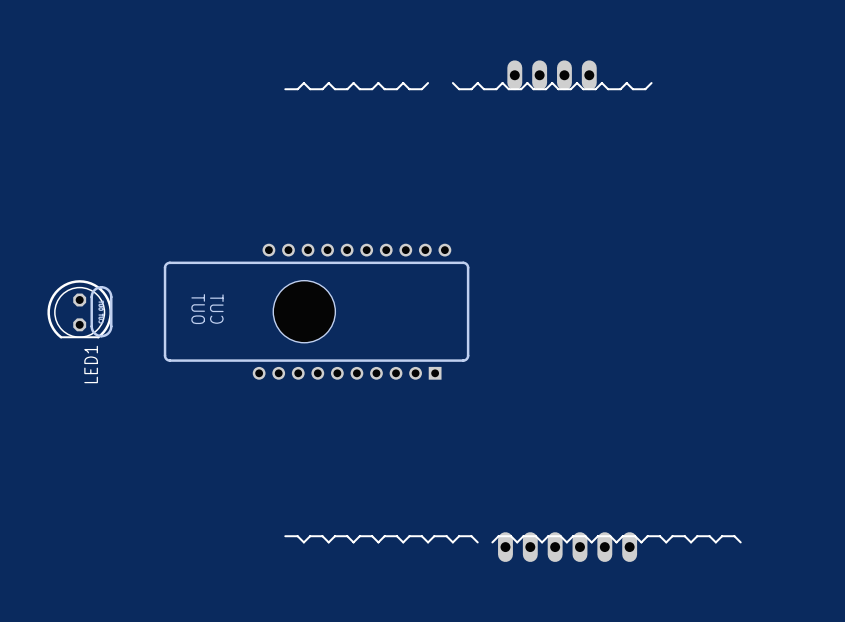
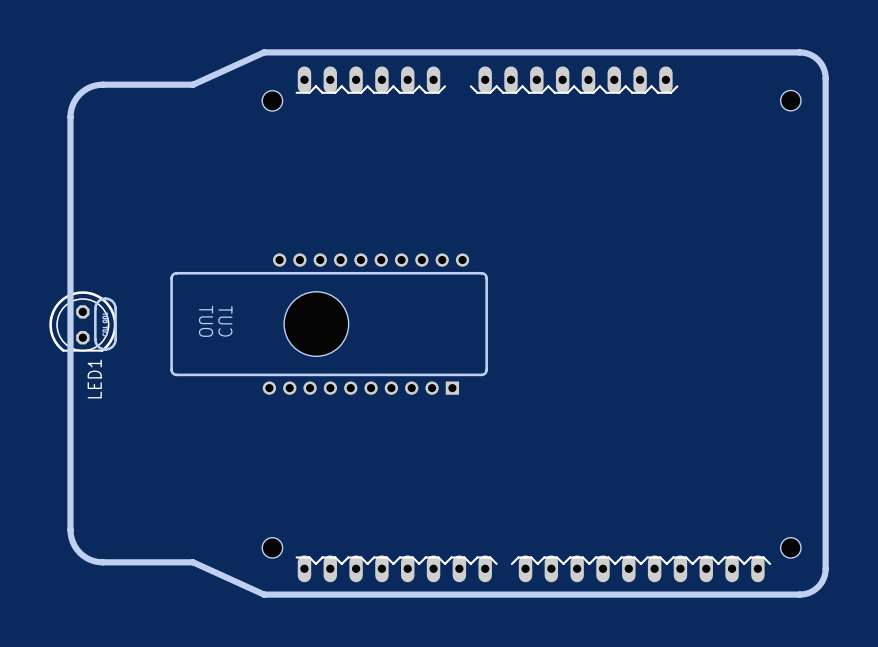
board edge: none -> (799, 52) (264, 52) (193, 84) (102, 84) (94, 85) (83, 91) (72, 104) (70, 116) (70, 530) (71, 538) (77, 549) (86, 558) (98, 562) (193, 562) (264, 594) (799, 594) (815, 589) (823, 578) (825, 568) (825, 78) (823, 68) (818, 59) (809, 54) (799, 52)
part footprint: [507, 60, 597, 91] -> [478, 66, 673, 94]
part: none -> (369, 79)
hole: none -> (790, 100)
hole: none -> (272, 100)
hole: none -> (272, 547)
hole: none -> (790, 547)
part: none -> (394, 568)
part: (567, 547) -> none
part: none -> (641, 568)

